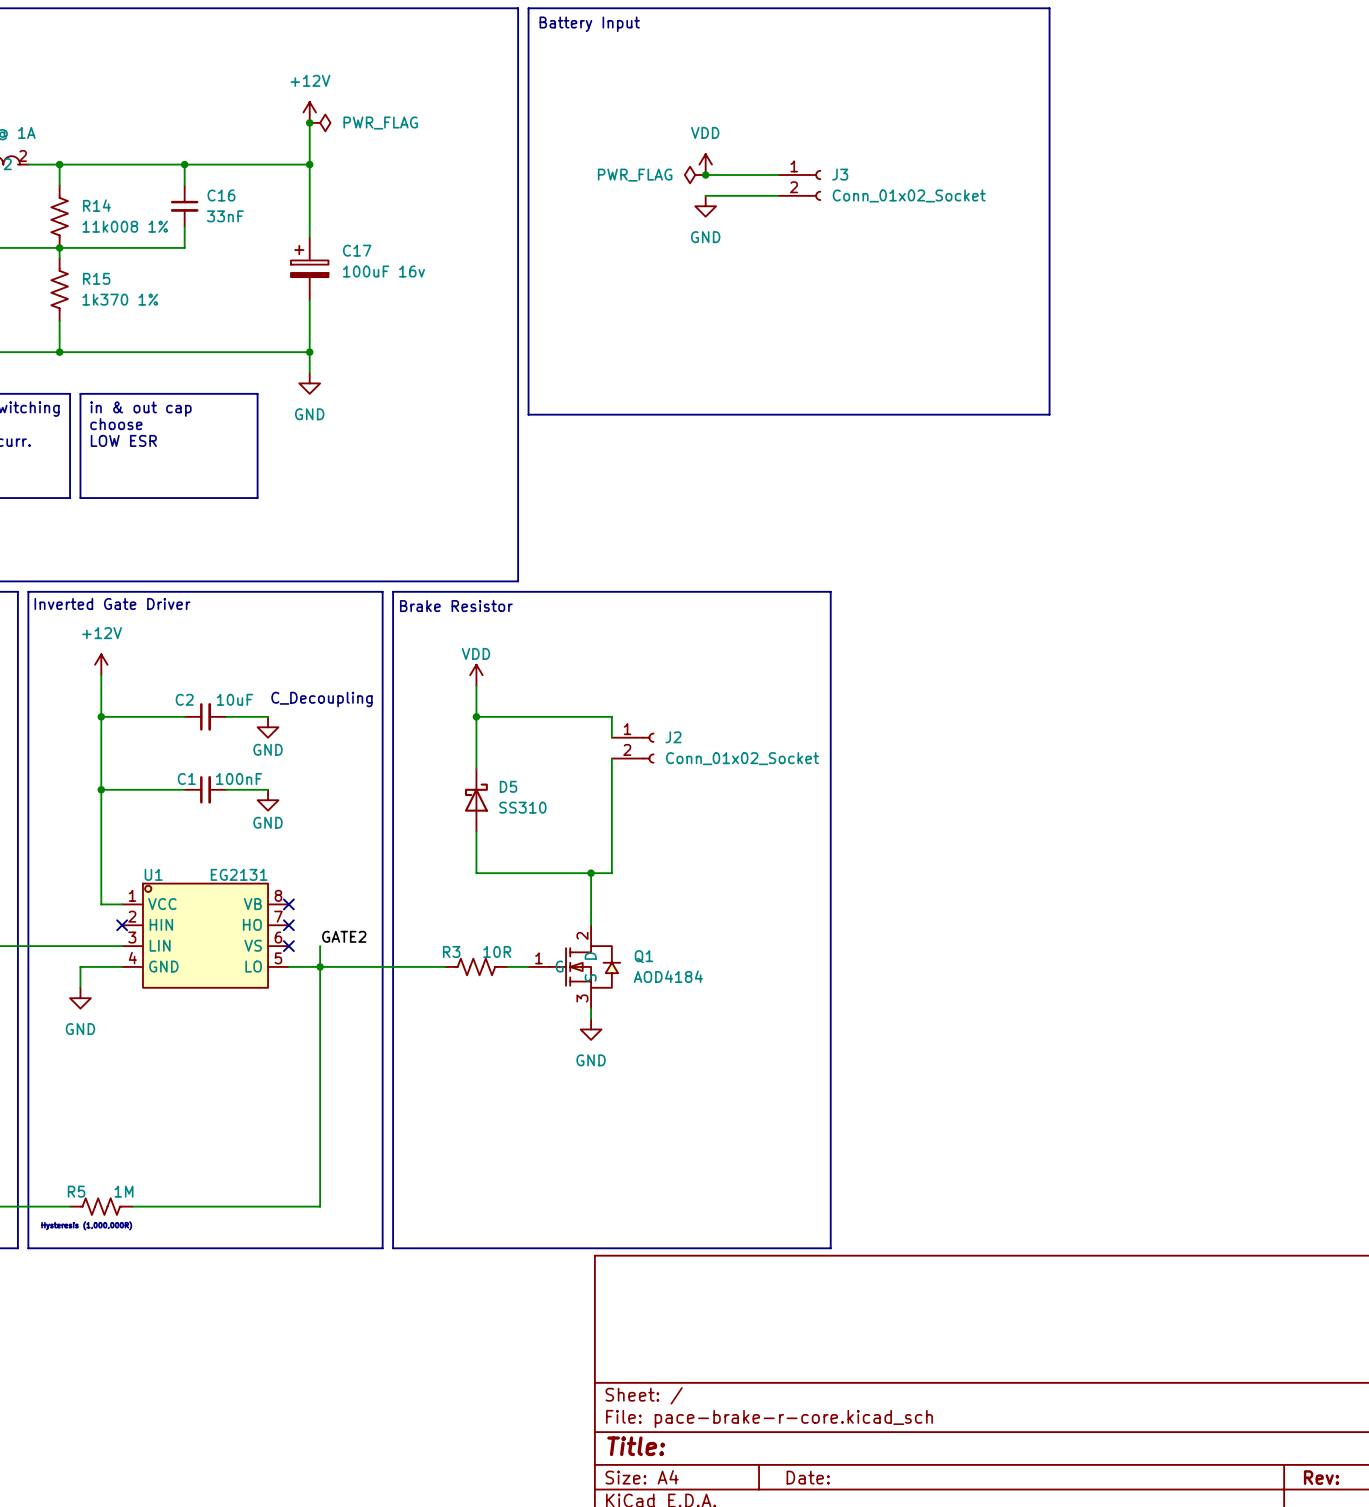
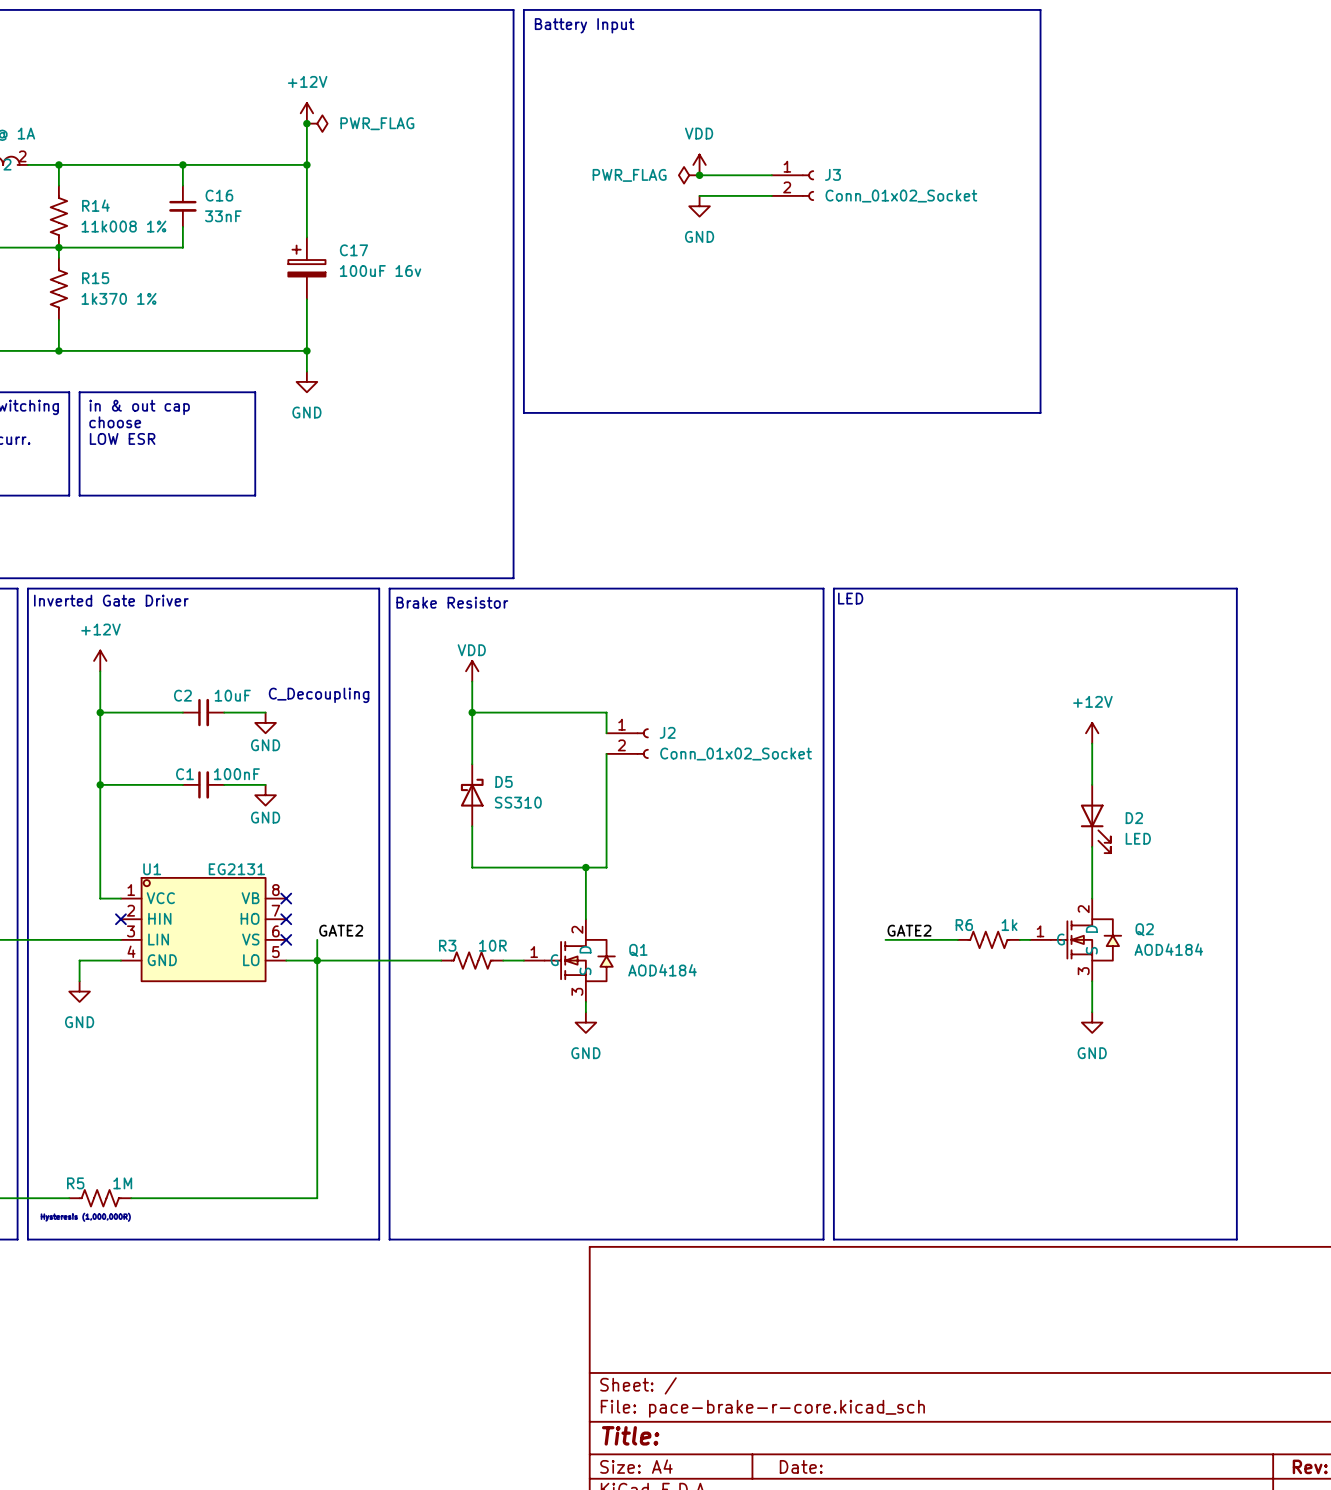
line: none -> (833, 588) (1236, 588) (1236, 1239) (833, 1239) (833, 588)
text: none -> LED (850, 598)
power symbol: none -> +12V (1092, 733)
wire: none -> (1092, 743) (1092, 784)
D2: none -> LED (1095, 819)
wire: none -> (1092, 846) (1092, 898)
label: none -> GATE2 (909, 930)
wire: none -> (885, 939) (957, 939)
R6: none -> 1k (988, 939)
wire: none -> (1019, 939) (1030, 939)
Q2: none -> AOD4184 (1075, 939)
wire: none -> (1092, 981) (1092, 1012)
power symbol: none -> GND (1092, 1022)

